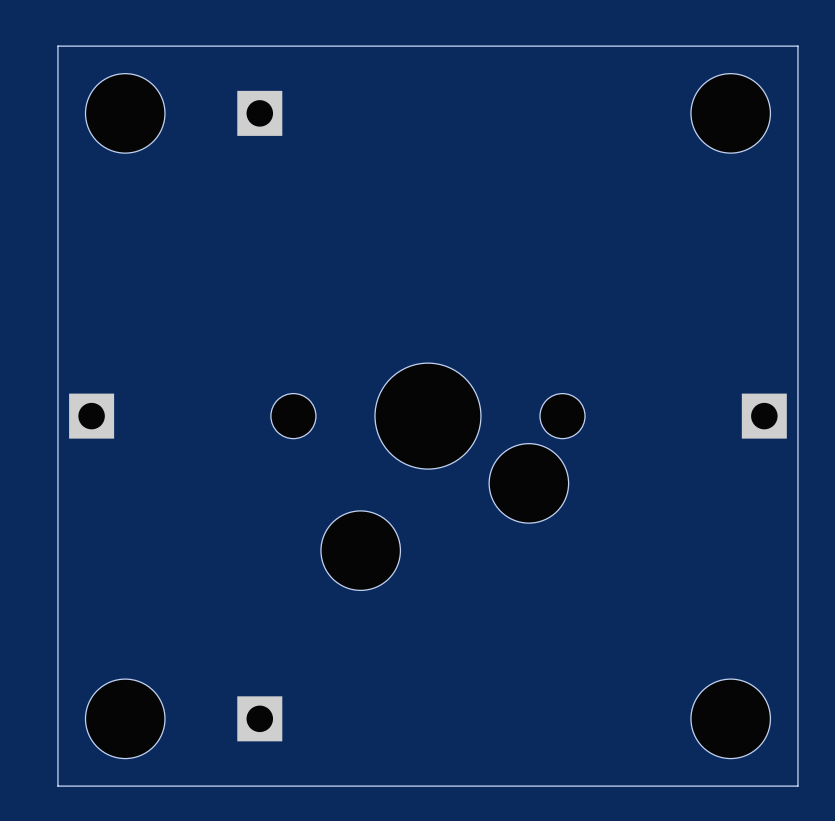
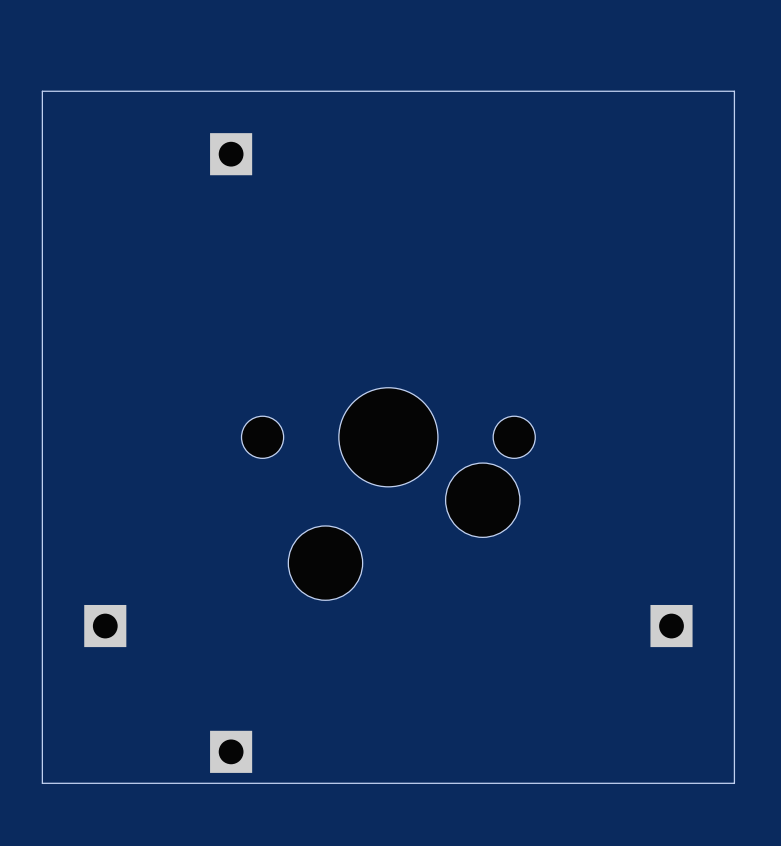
part: (125, 113) -> none
part: (730, 113) -> none
part: (91, 416) -> none
part position: (764, 416) -> (671, 626)
part: none -> (105, 626)
part: (125, 718) -> none
part position: (259, 718) -> (231, 751)
part: (730, 718) -> none

